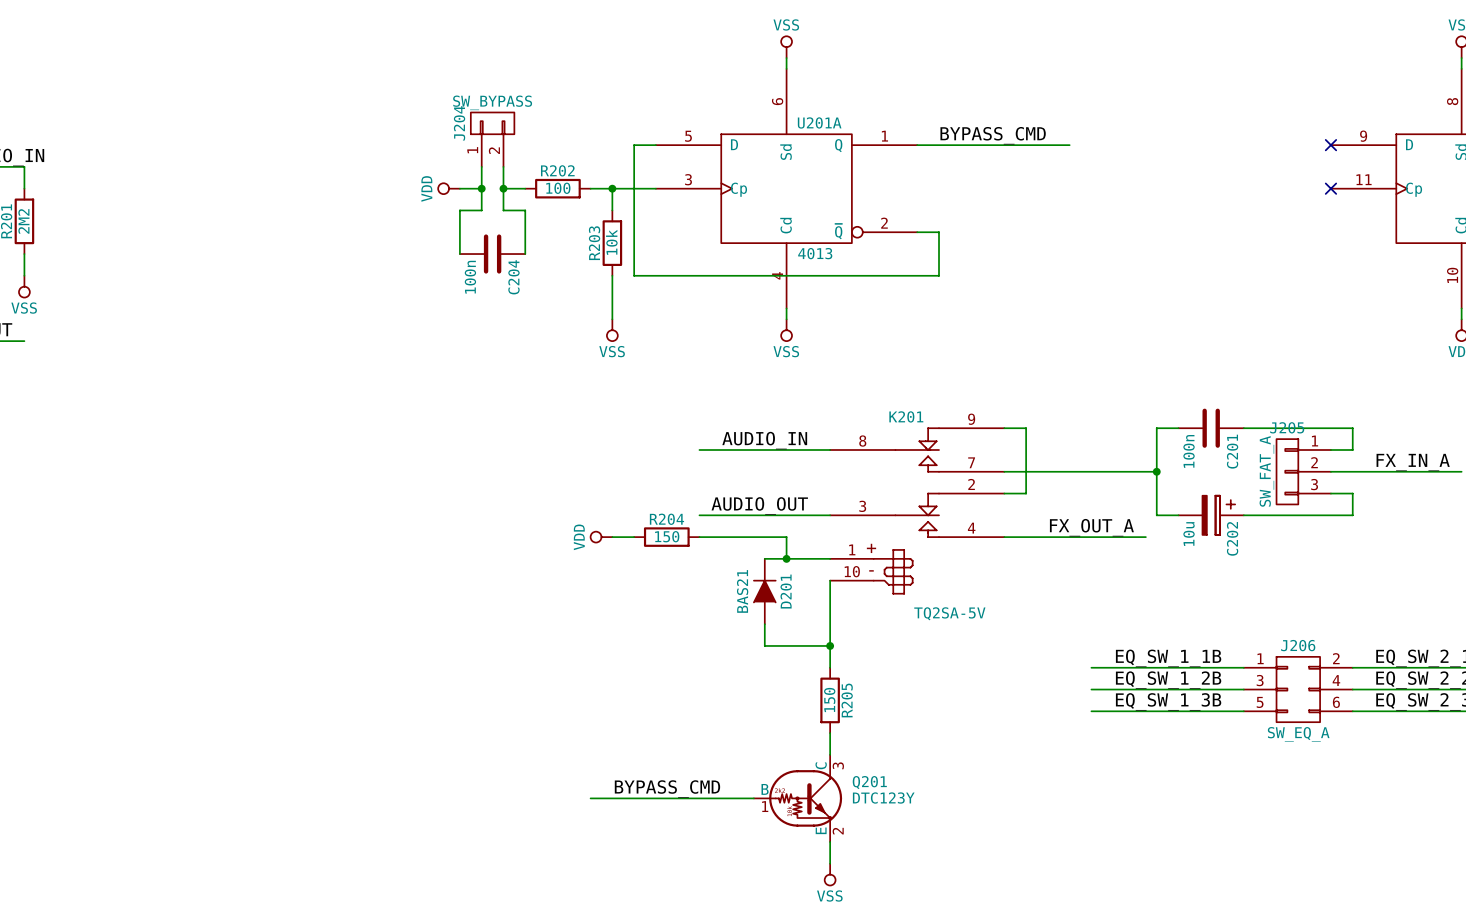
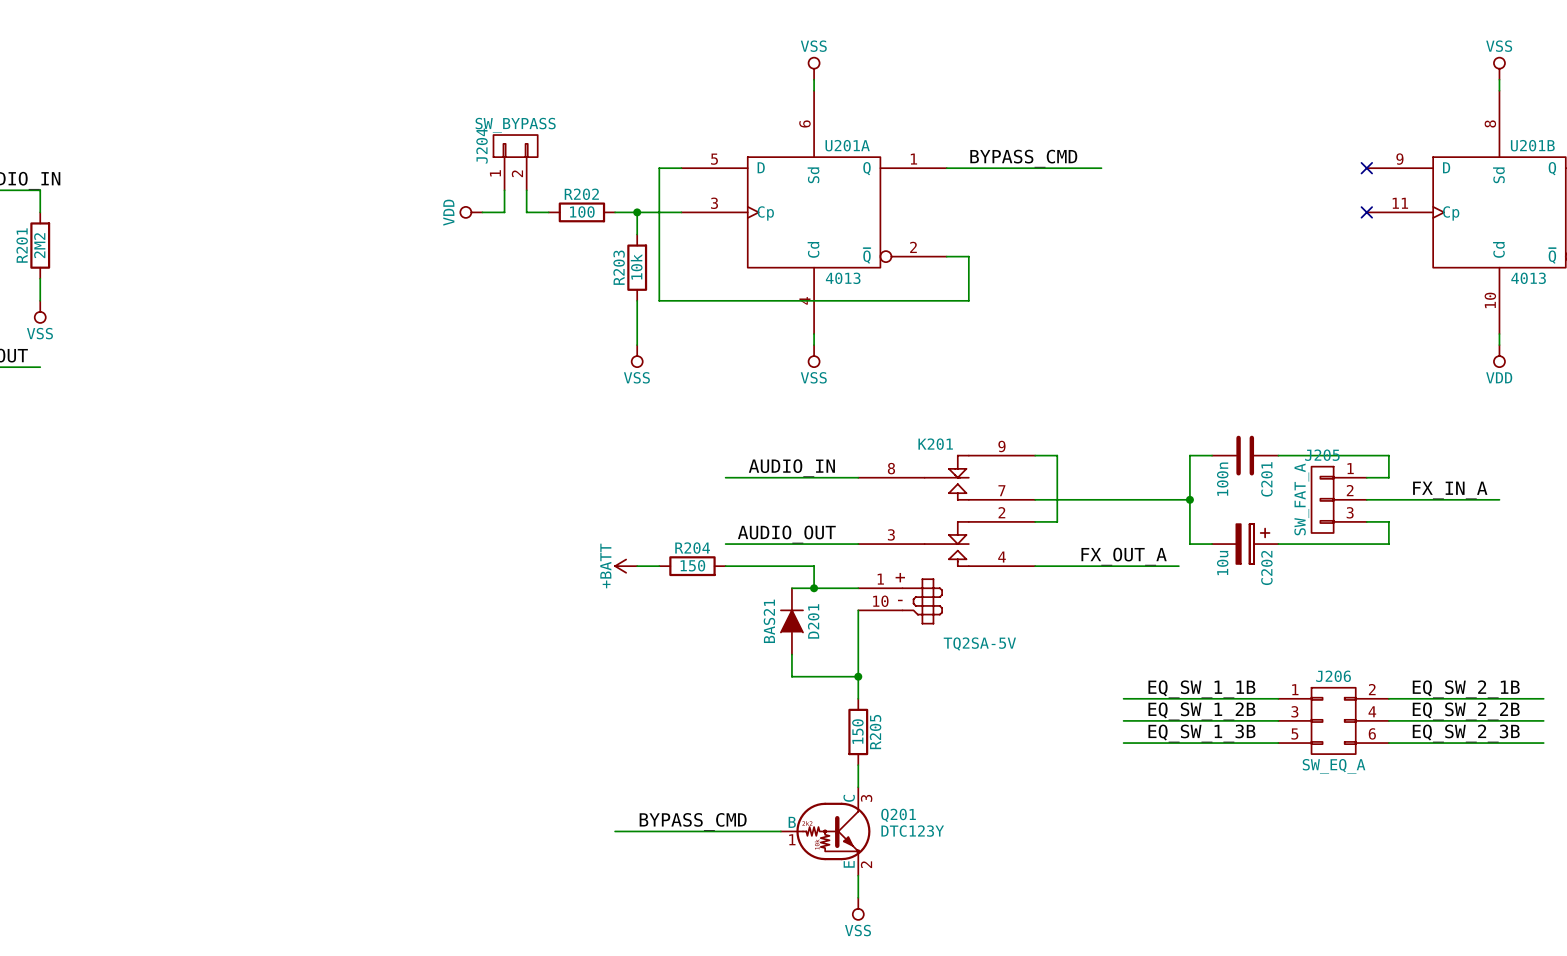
wire: (481, 188) (481, 210) (459, 210) (459, 254) -> none
junction: (481, 188) -> none
wire: (503, 188) (503, 210) (525, 210) (525, 254) -> none
junction: (503, 188) -> none
C204: 100n (492, 254) -> none
power symbol: VDD (601, 537) -> +BATT (626, 566)

